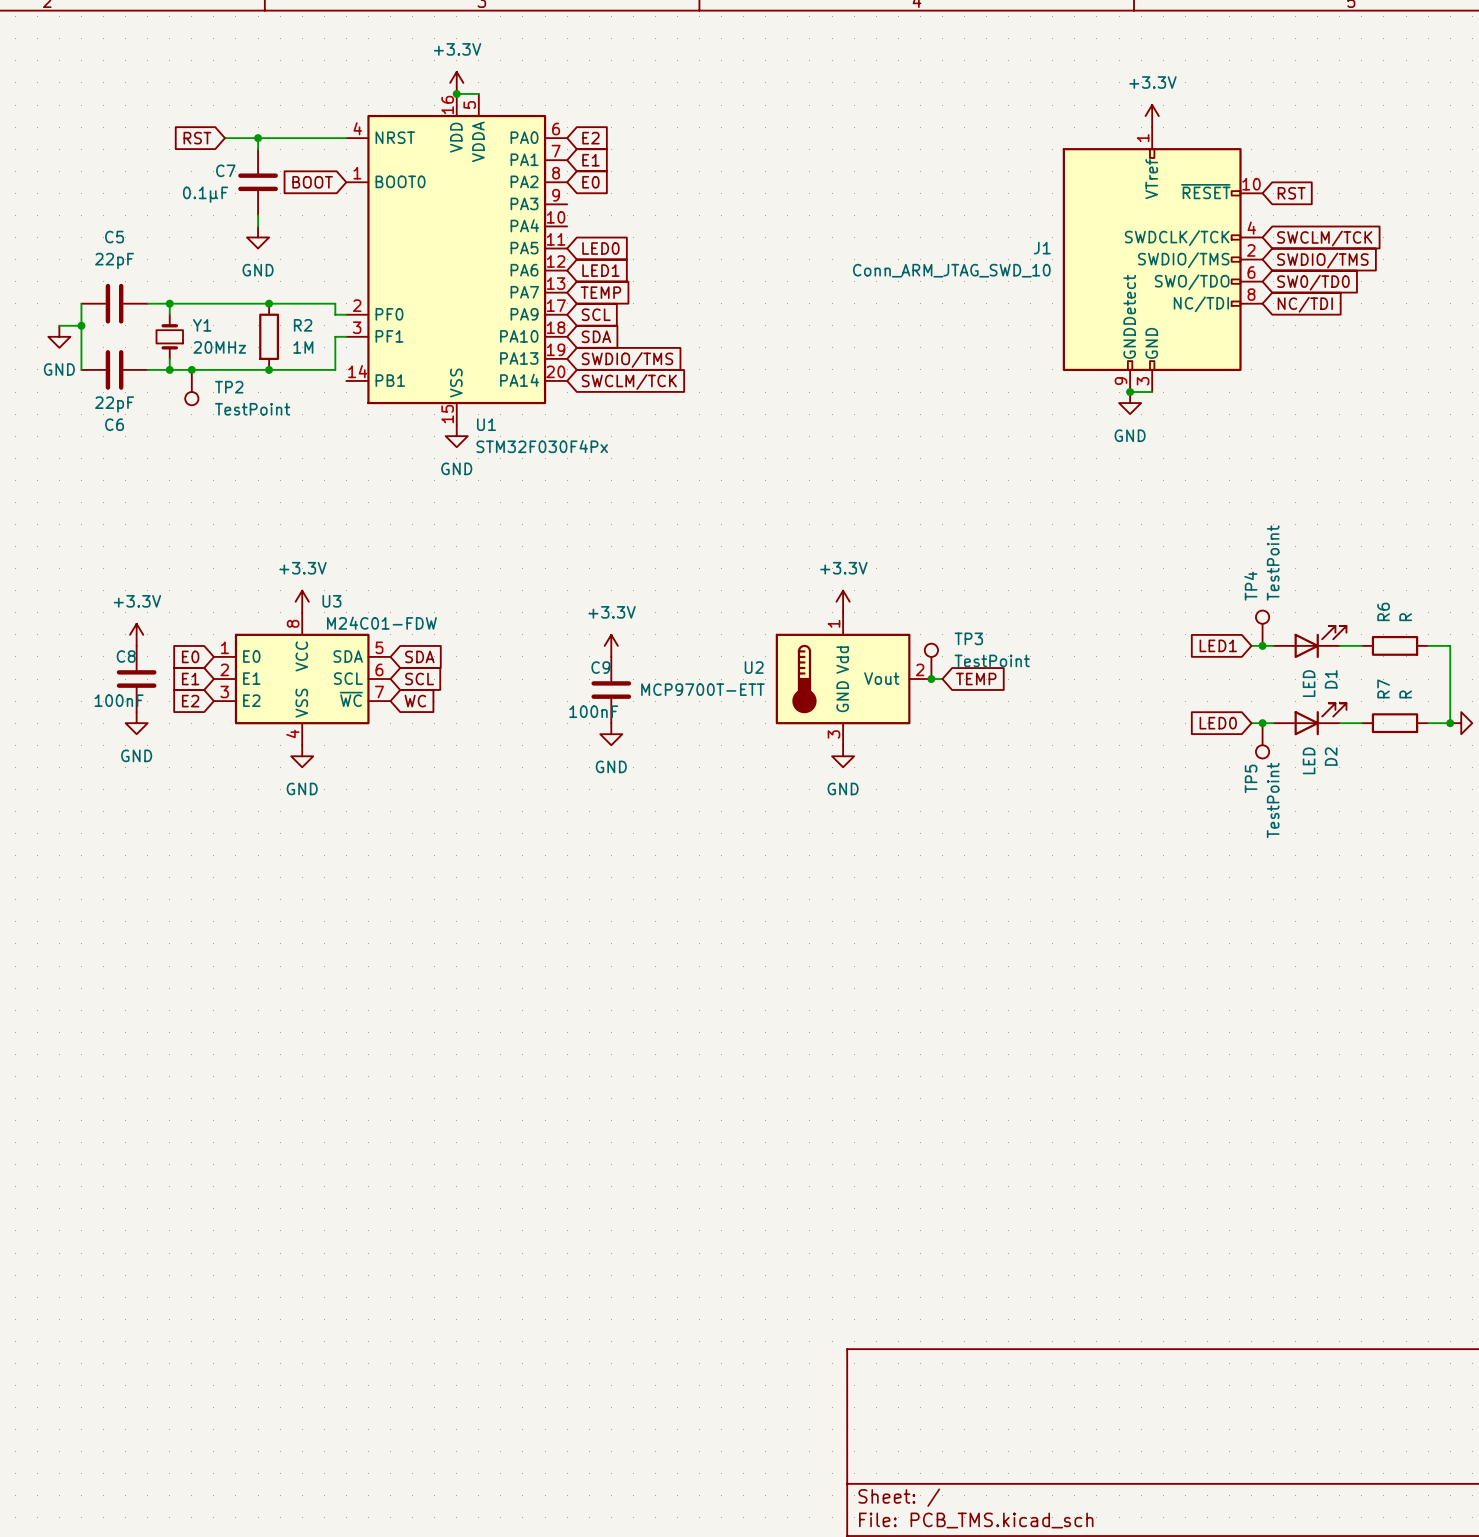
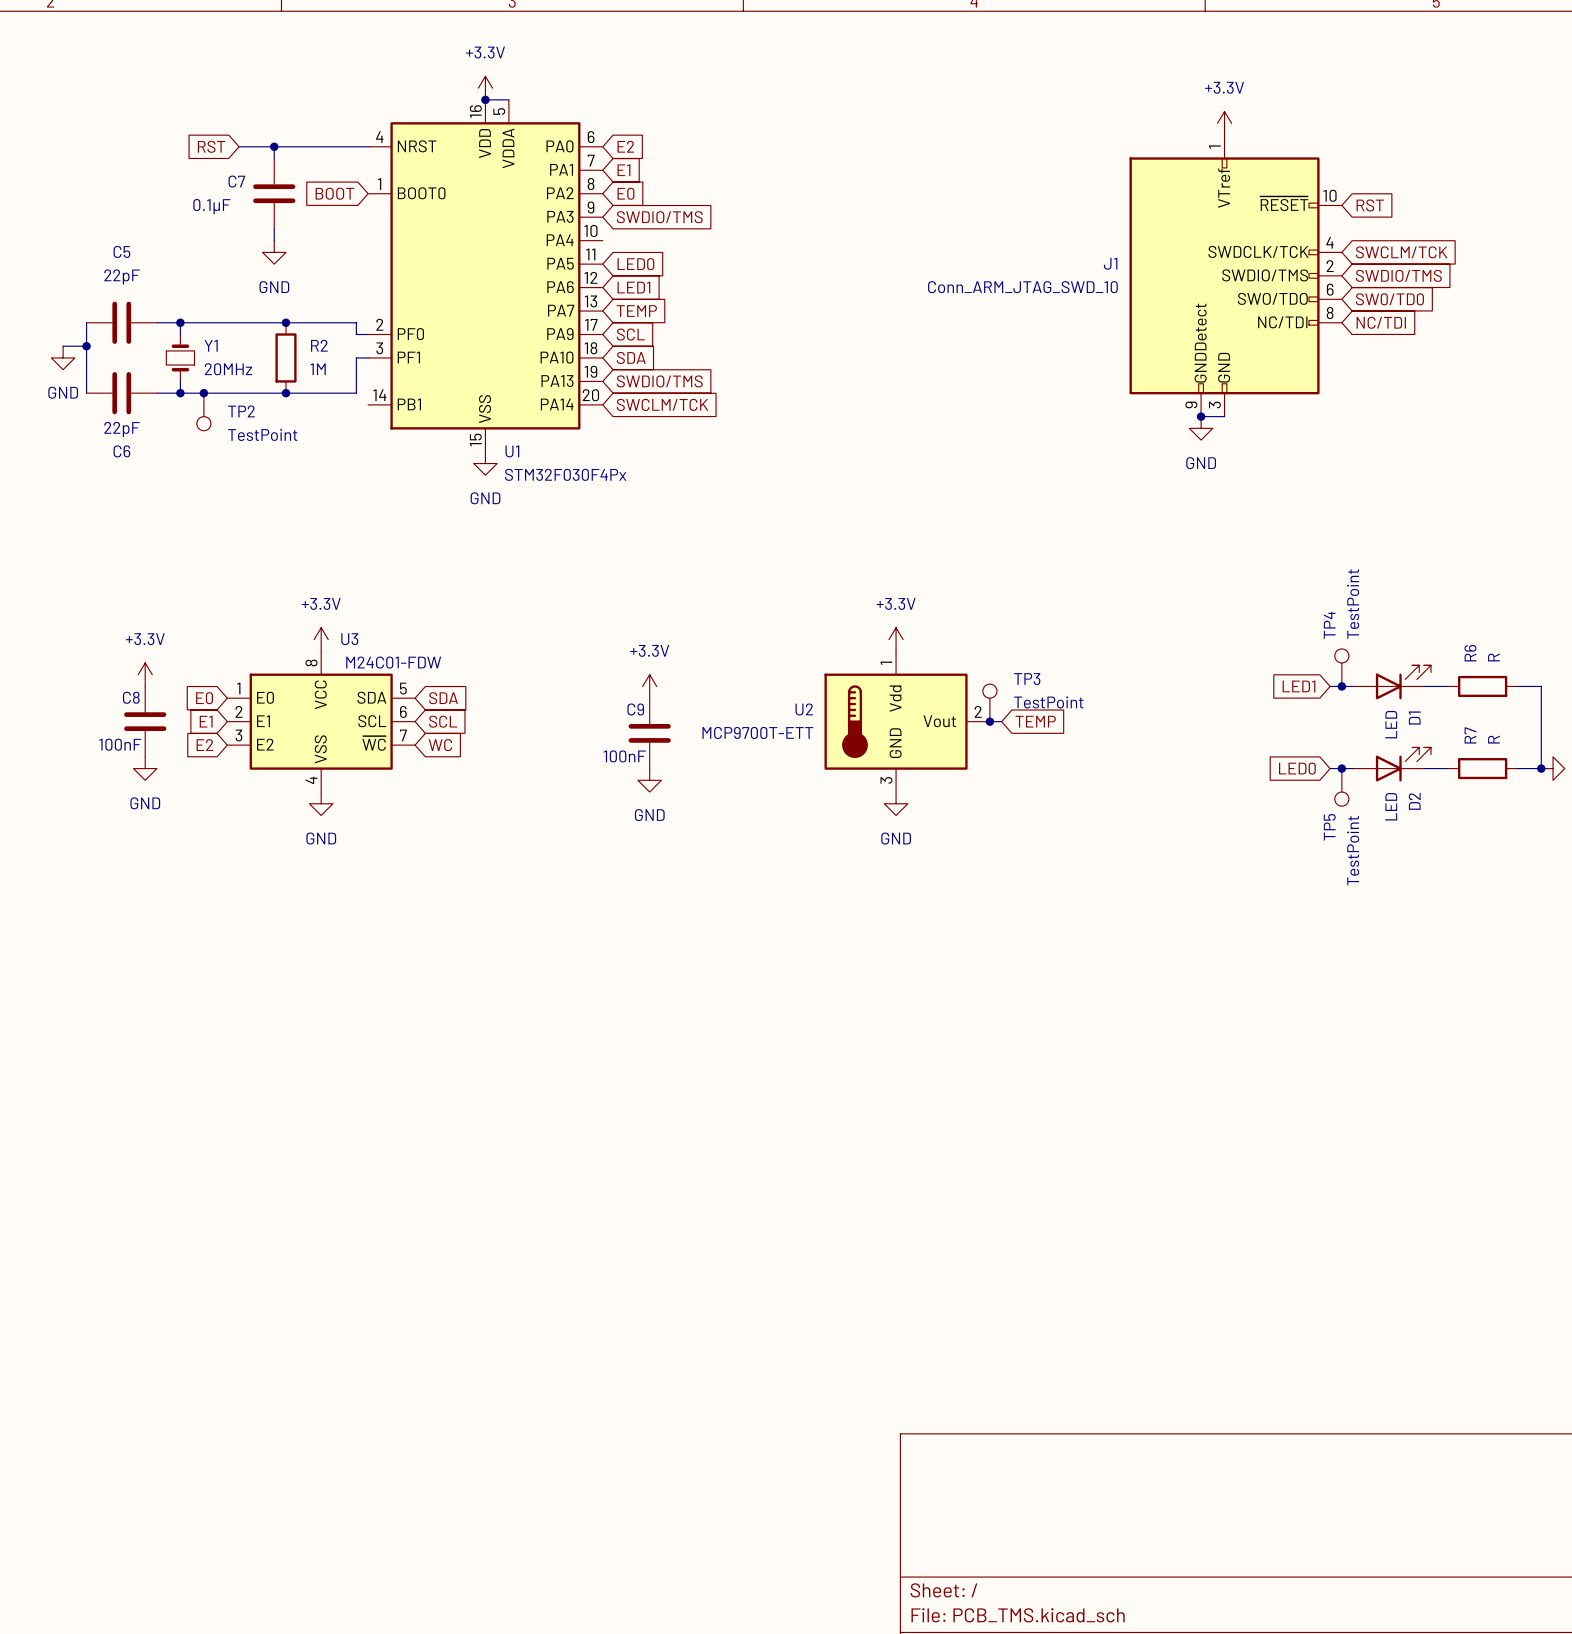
global label: none -> SWDIO/TMS (659, 217)

